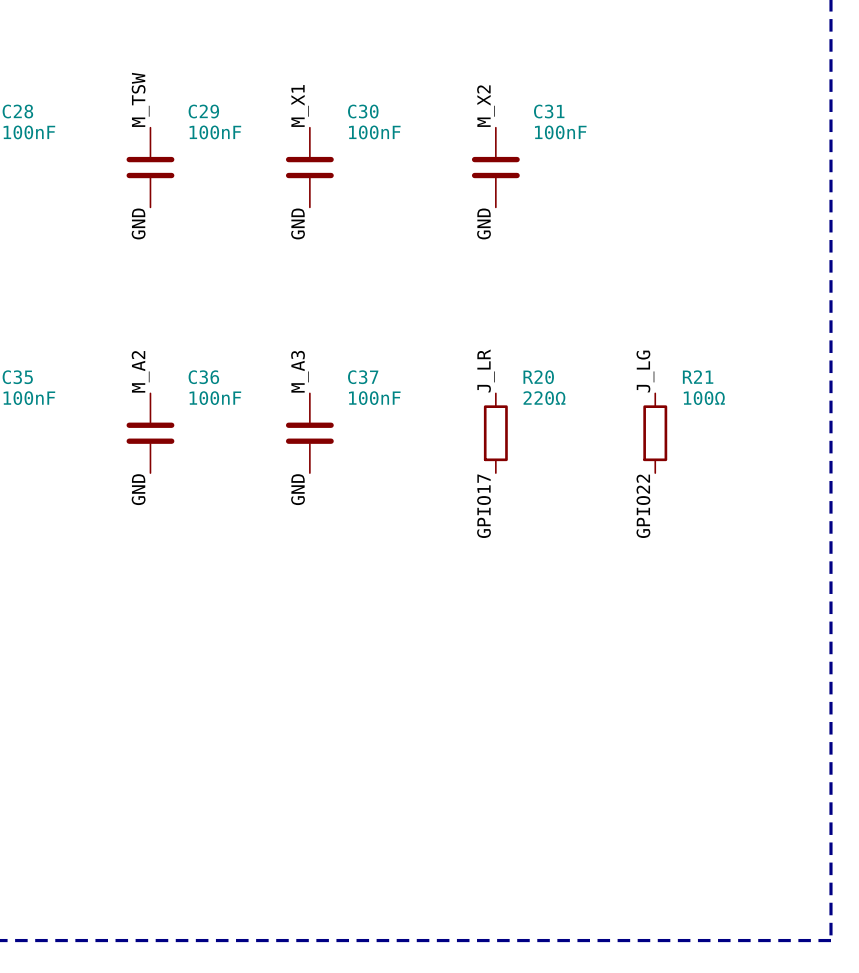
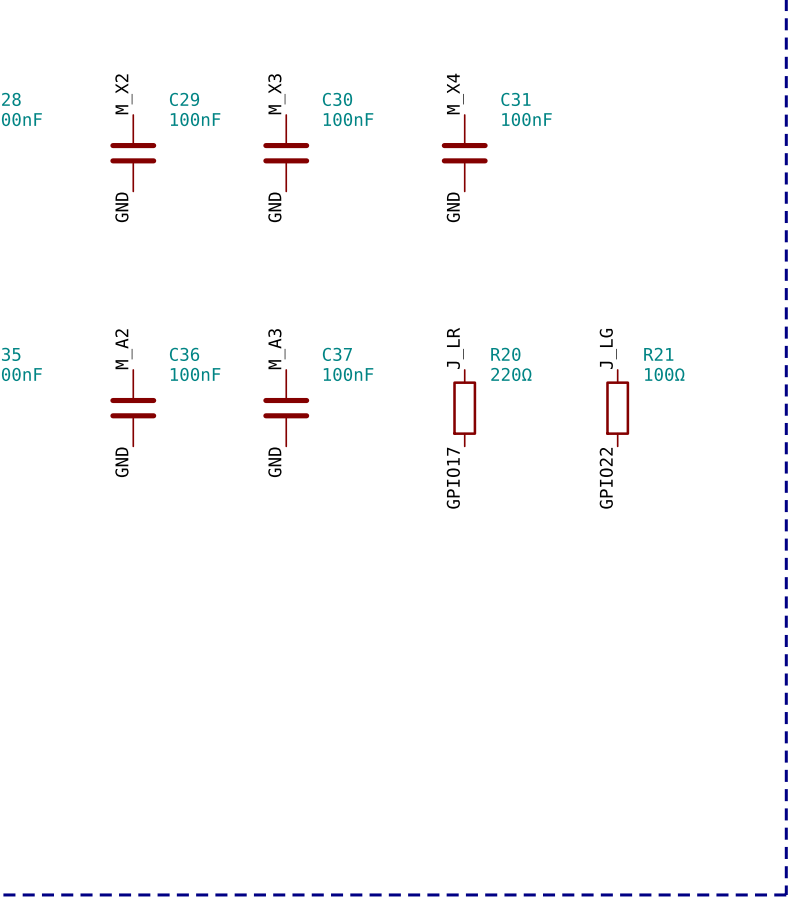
label: M_TSW (140, 99) -> M_X2 (123, 94)
label: M_X1 (300, 105) -> M_X3 (276, 94)
label: M_X2 (486, 106) -> M_X4 (455, 93)

